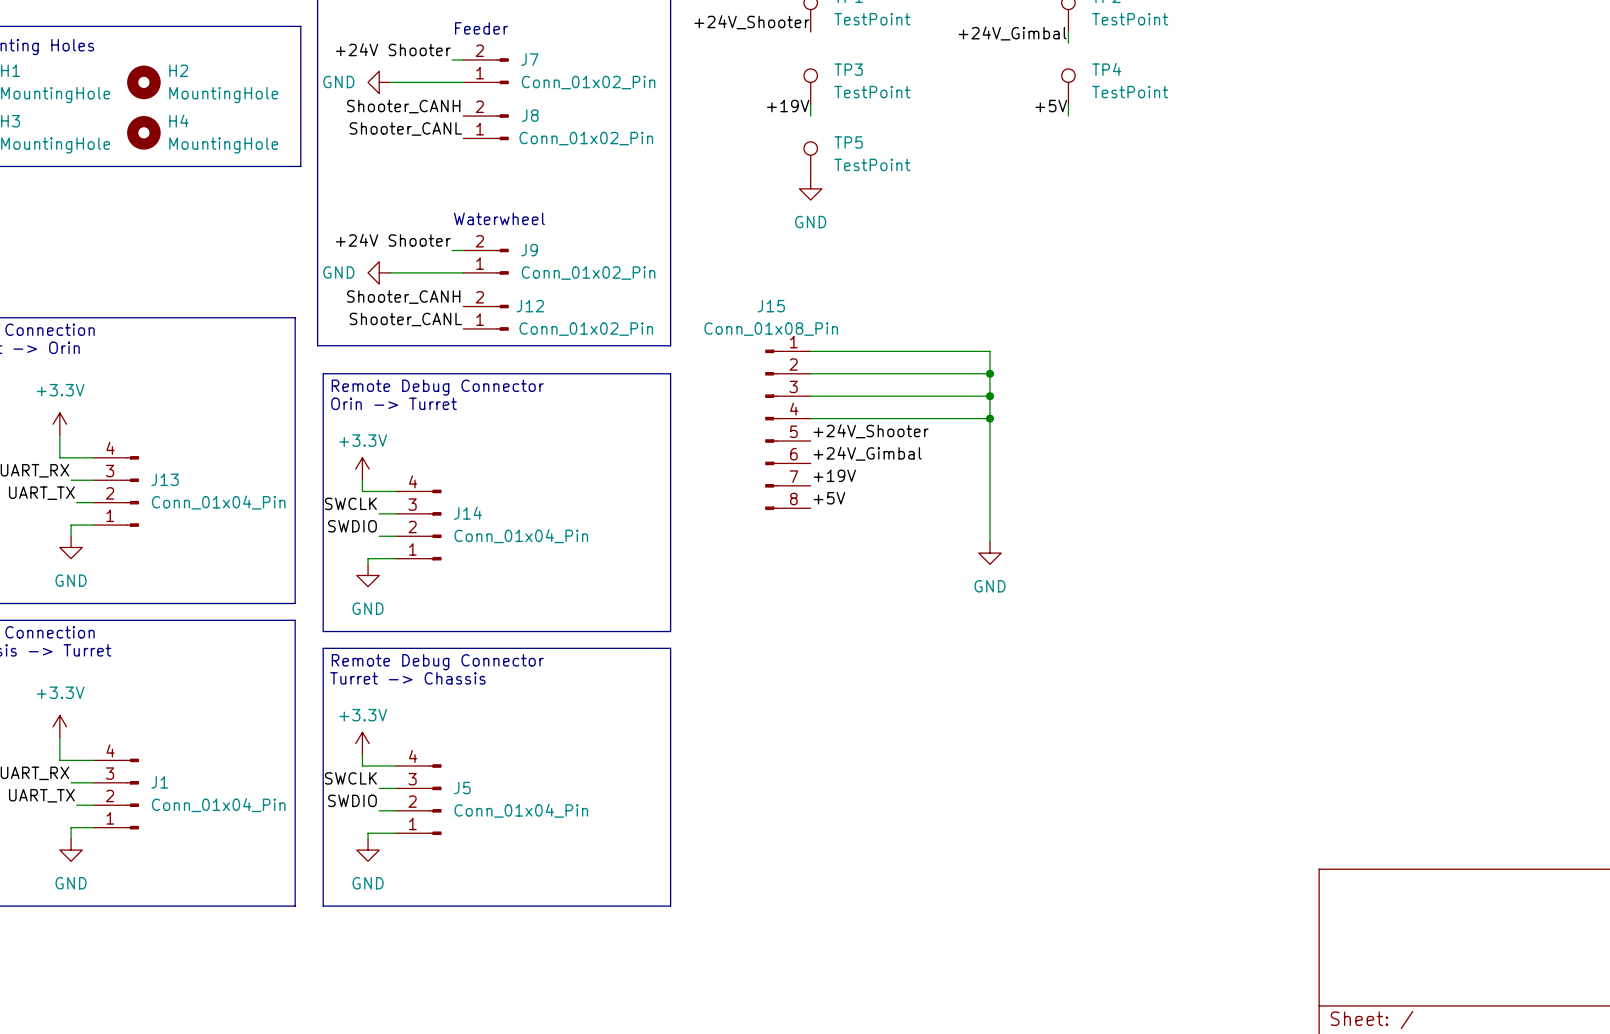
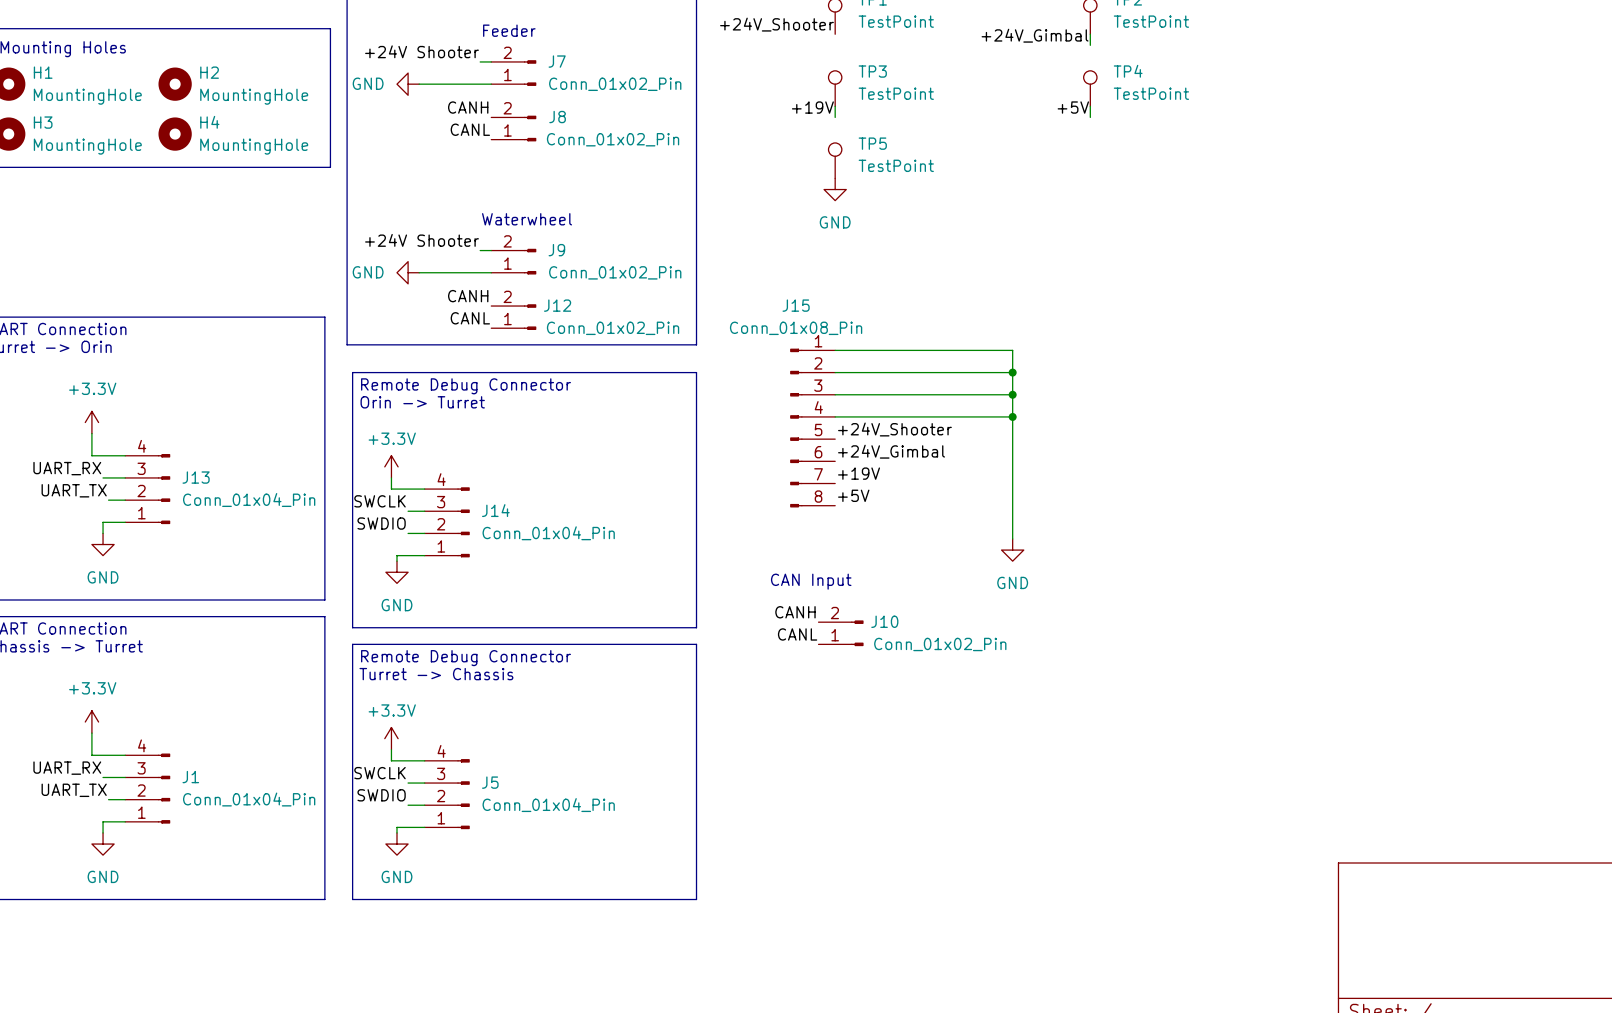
label: Shooter_CANH (403, 106) -> CANH (468, 107)
label: Shooter_CANL (405, 128) -> CANL (470, 129)
label: Shooter_CANH (403, 297) -> CANH (468, 296)
label: Shooter_CANL (405, 319) -> CANL (470, 318)
text: none -> CAN Input (811, 581)
label: none -> CANH (795, 612)
J10: none -> Conn_01x02_Pin (841, 633)
label: none -> CANL (797, 634)

